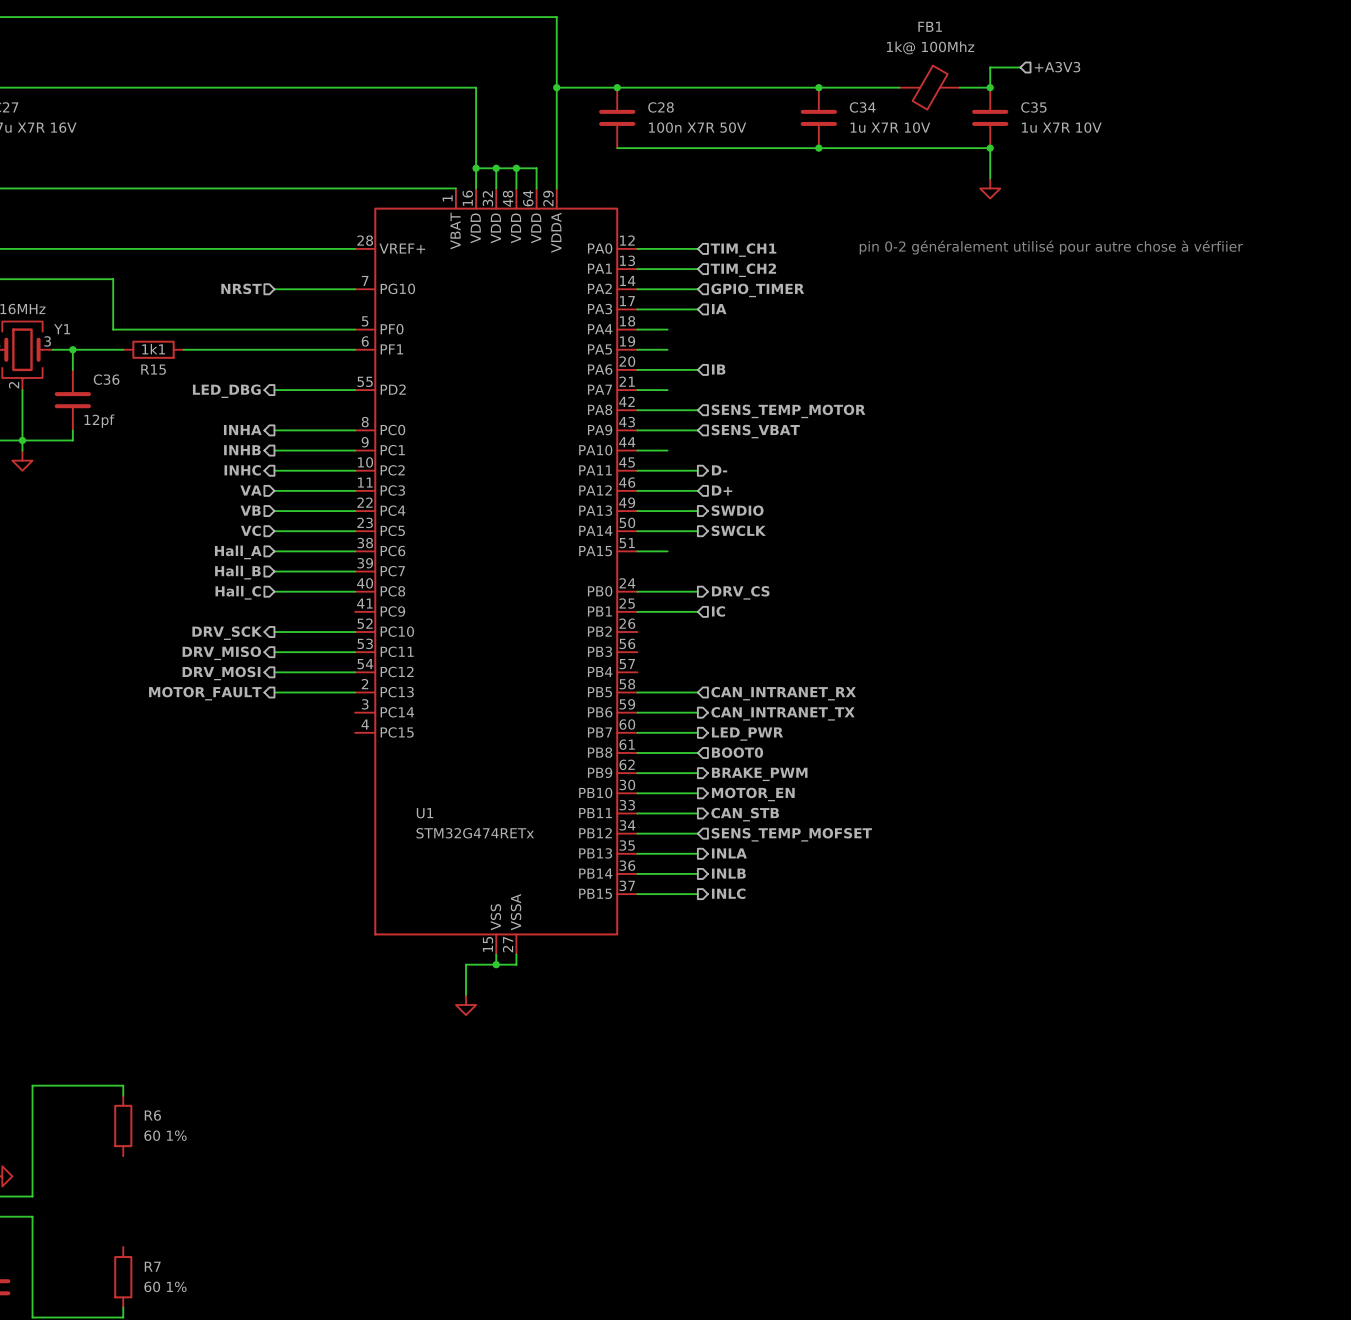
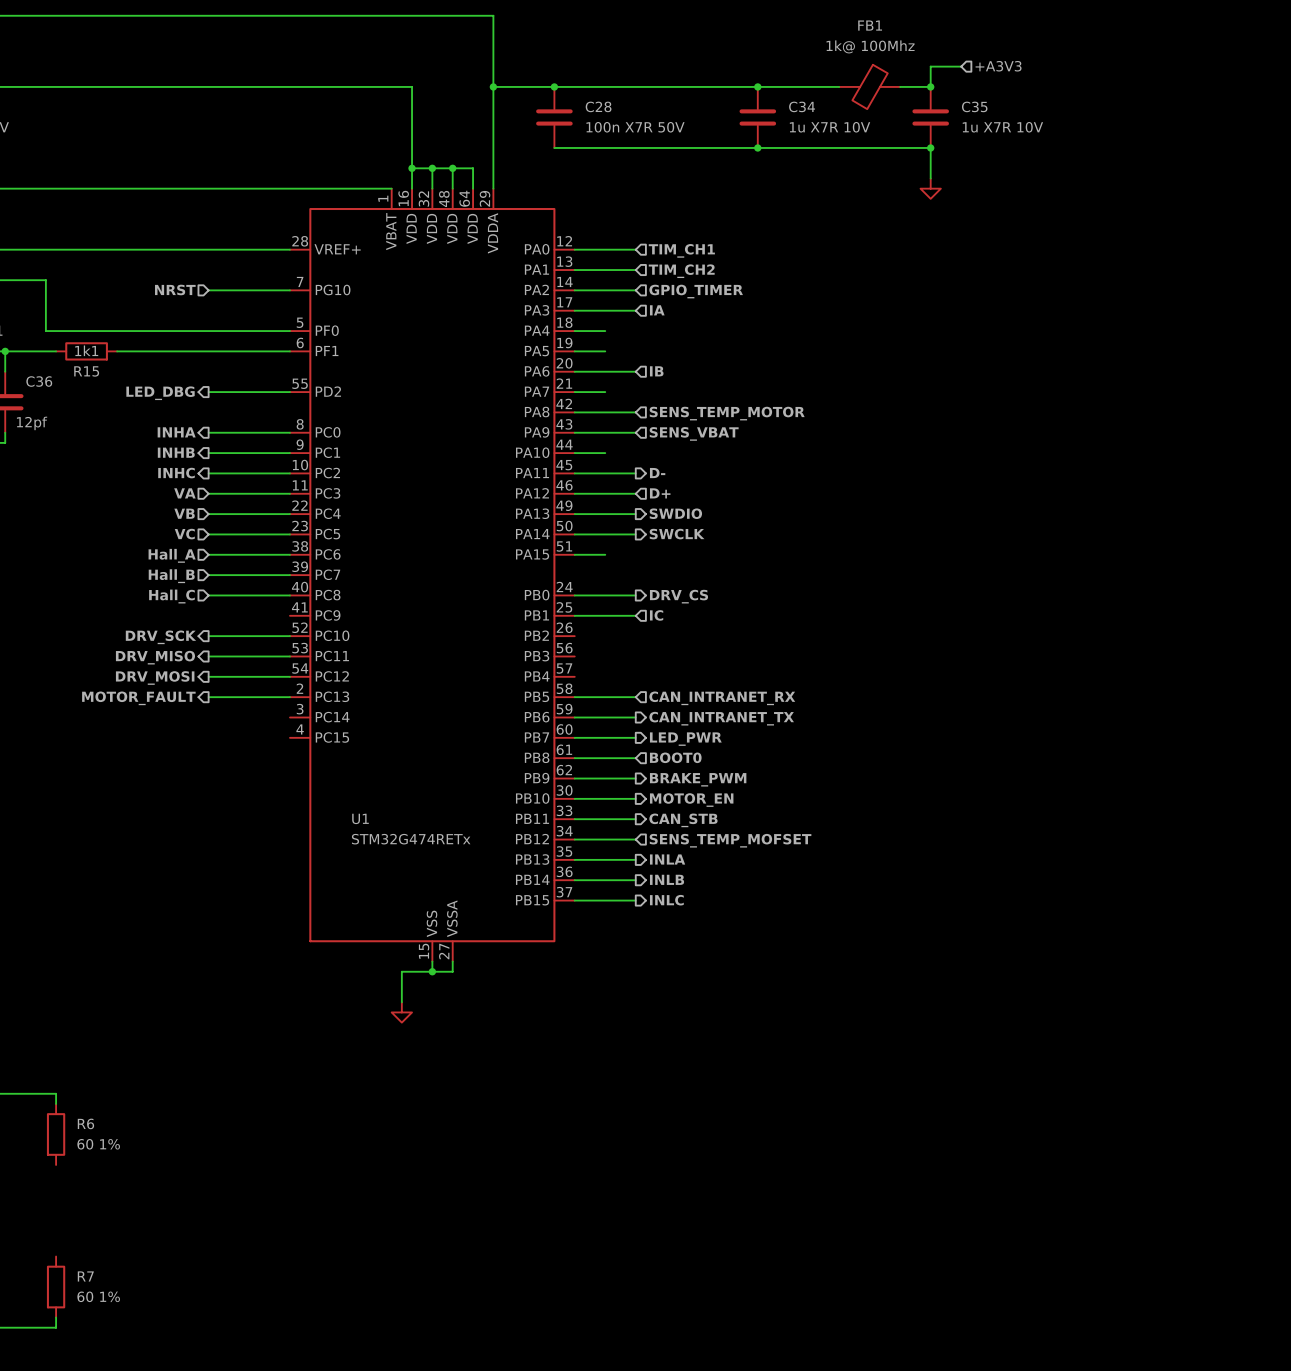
text: pin 0-2 généralement utilisé pour autre chose à vérfiier (1051, 247) -> none

